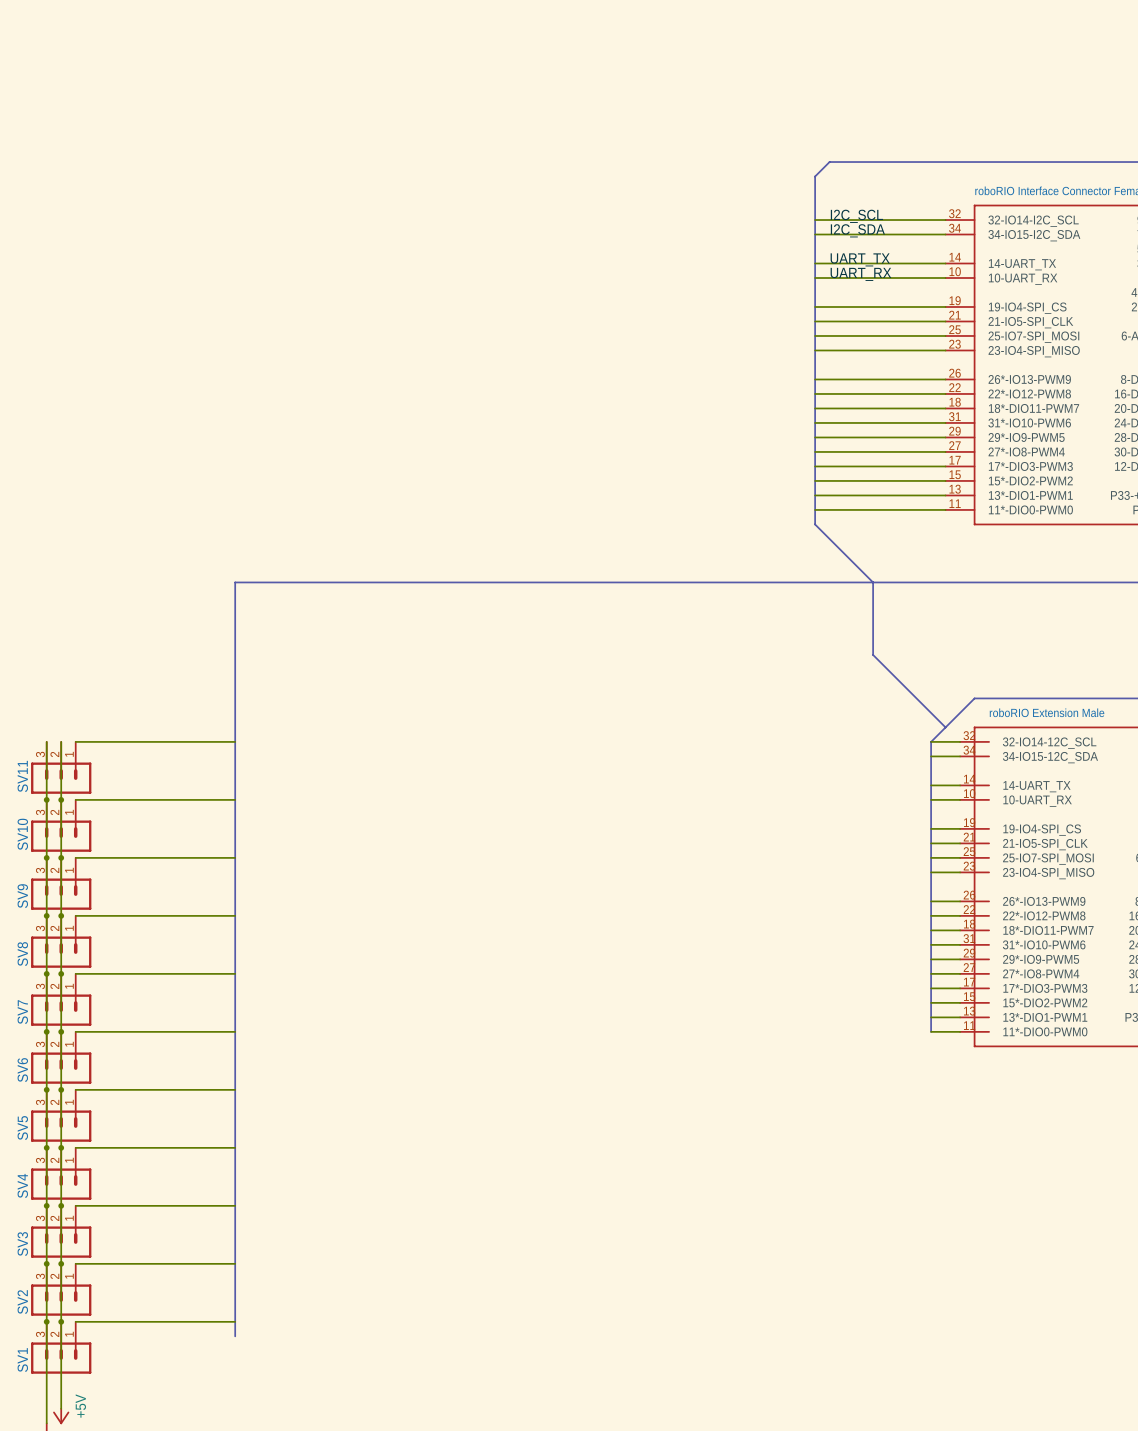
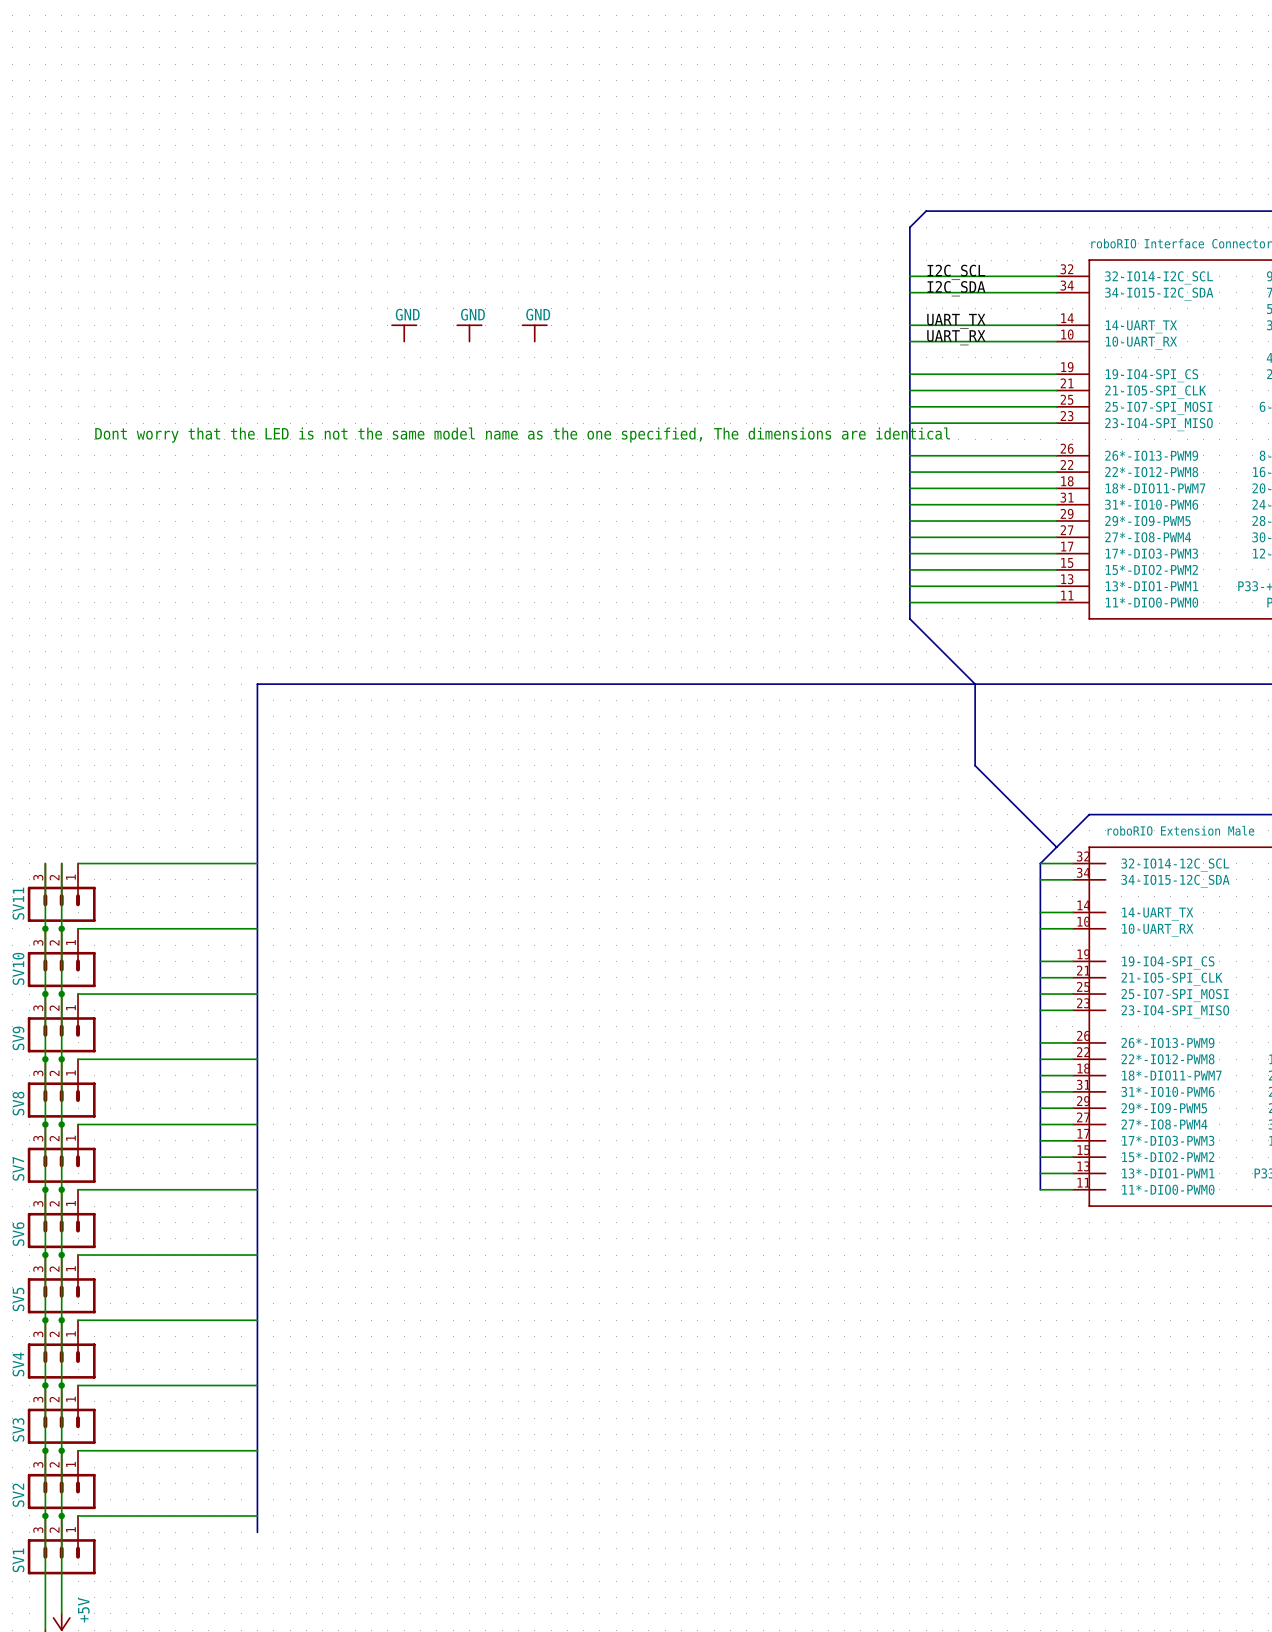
power symbol: none -> GND (404, 333)
power symbol: none -> GND (469, 333)
power symbol: none -> GND (534, 333)
text: none -> Dont worry that the LED is not the same model name as the one specified, The dimensions are identical (522, 435)

